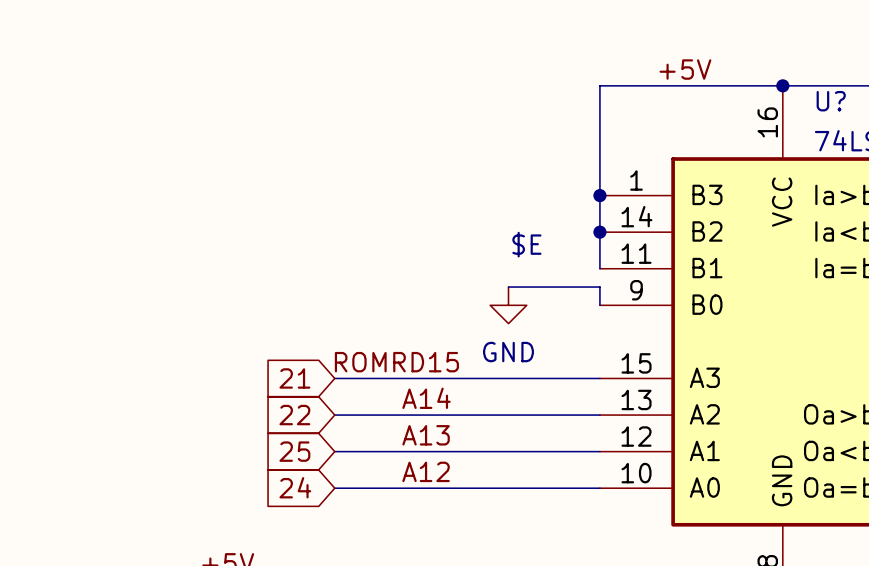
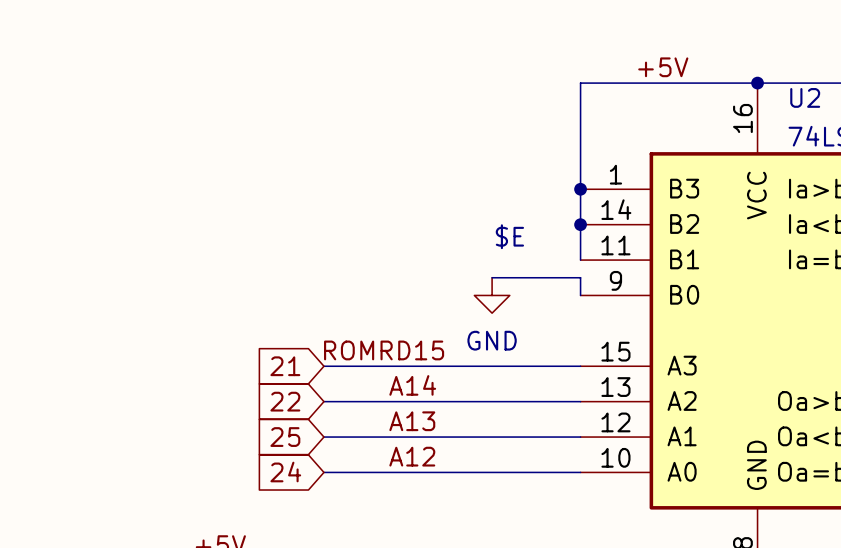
U? name: U? (831, 101) -> U2 (805, 97)

